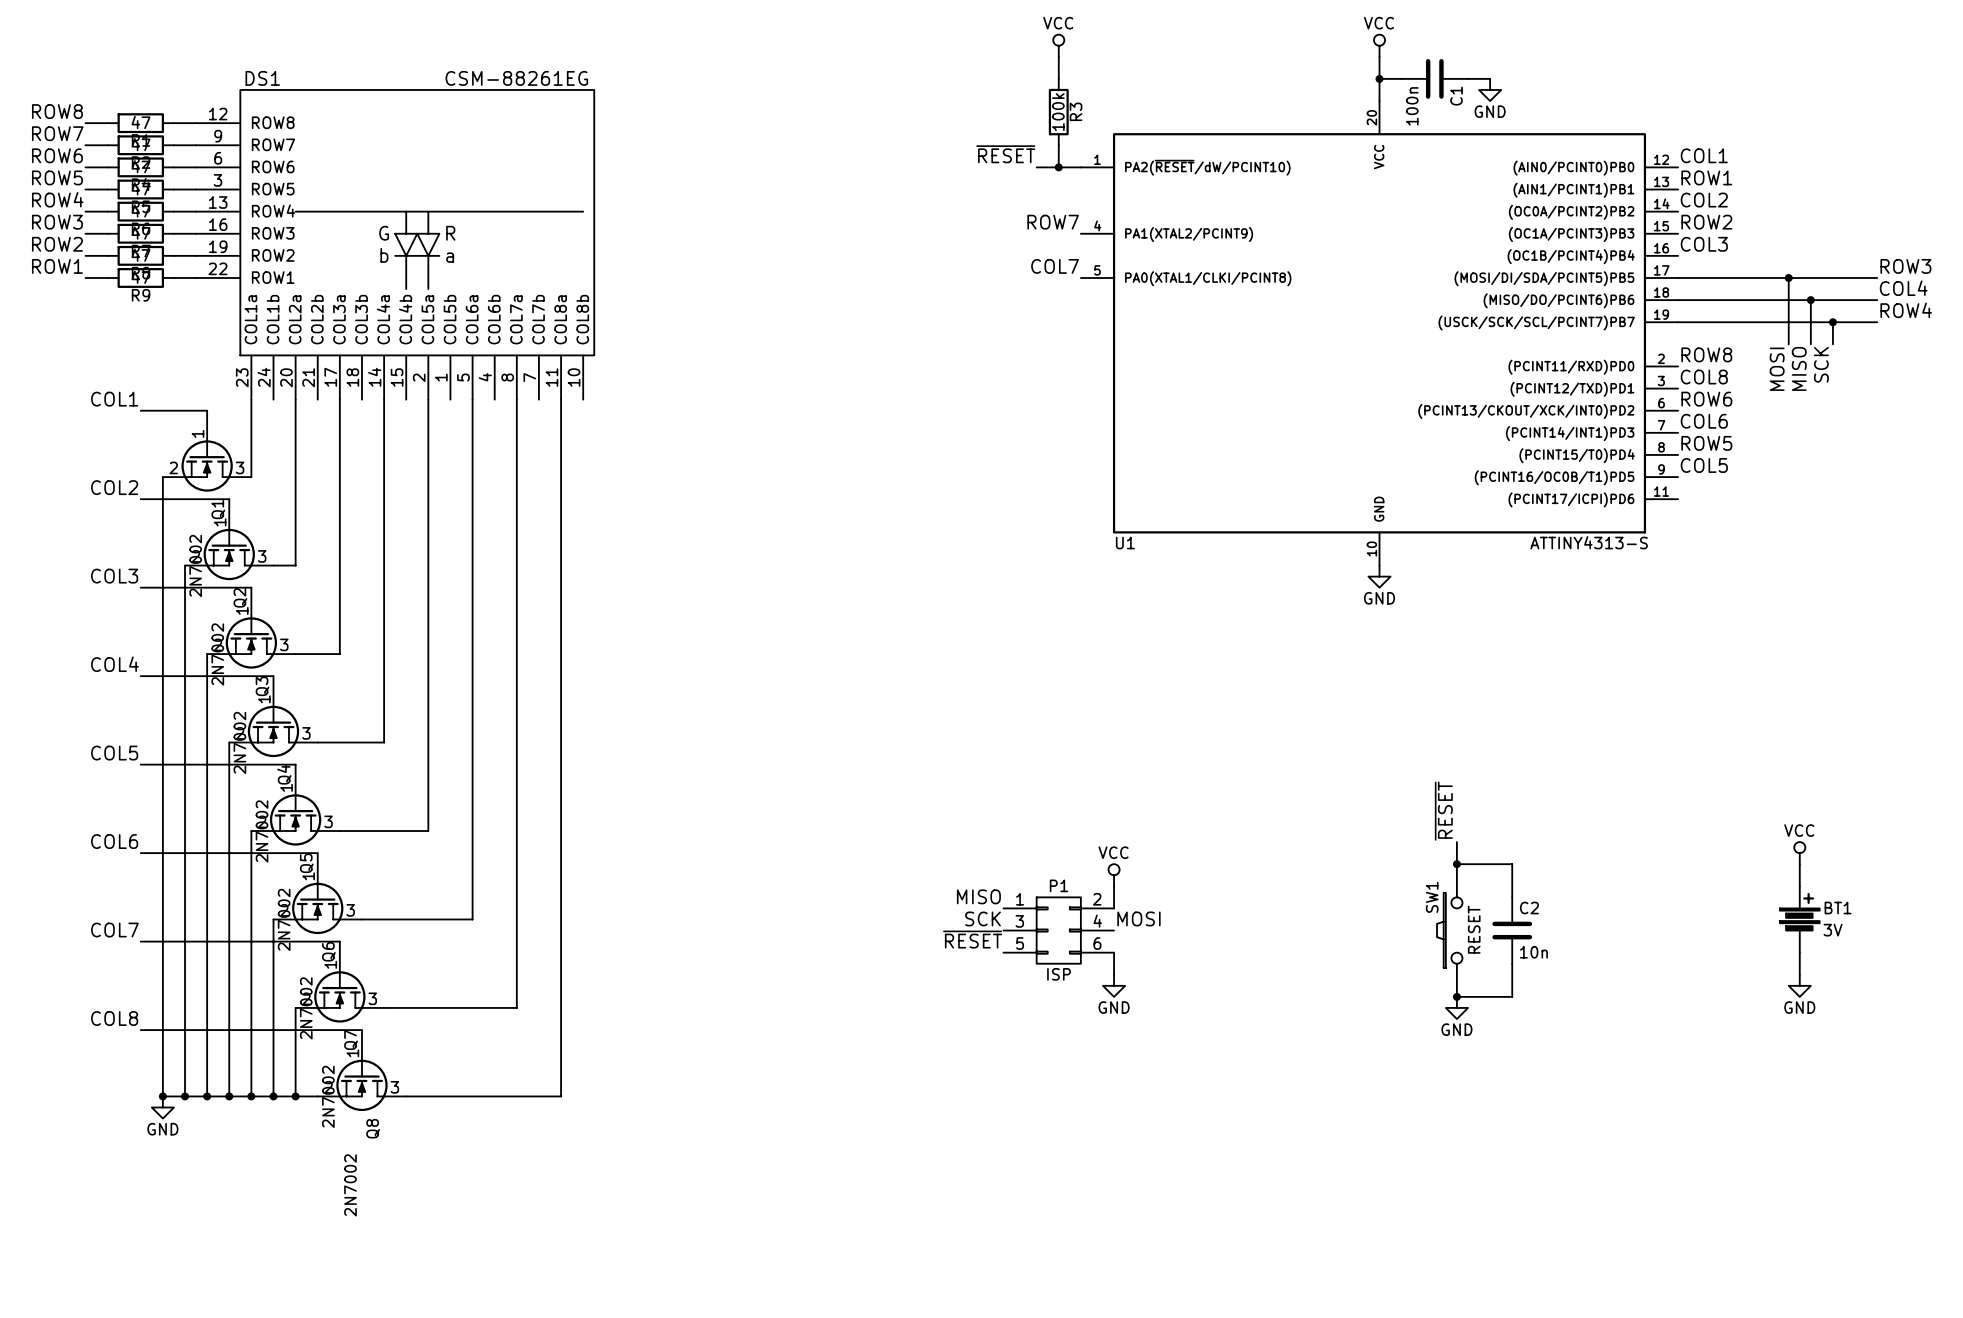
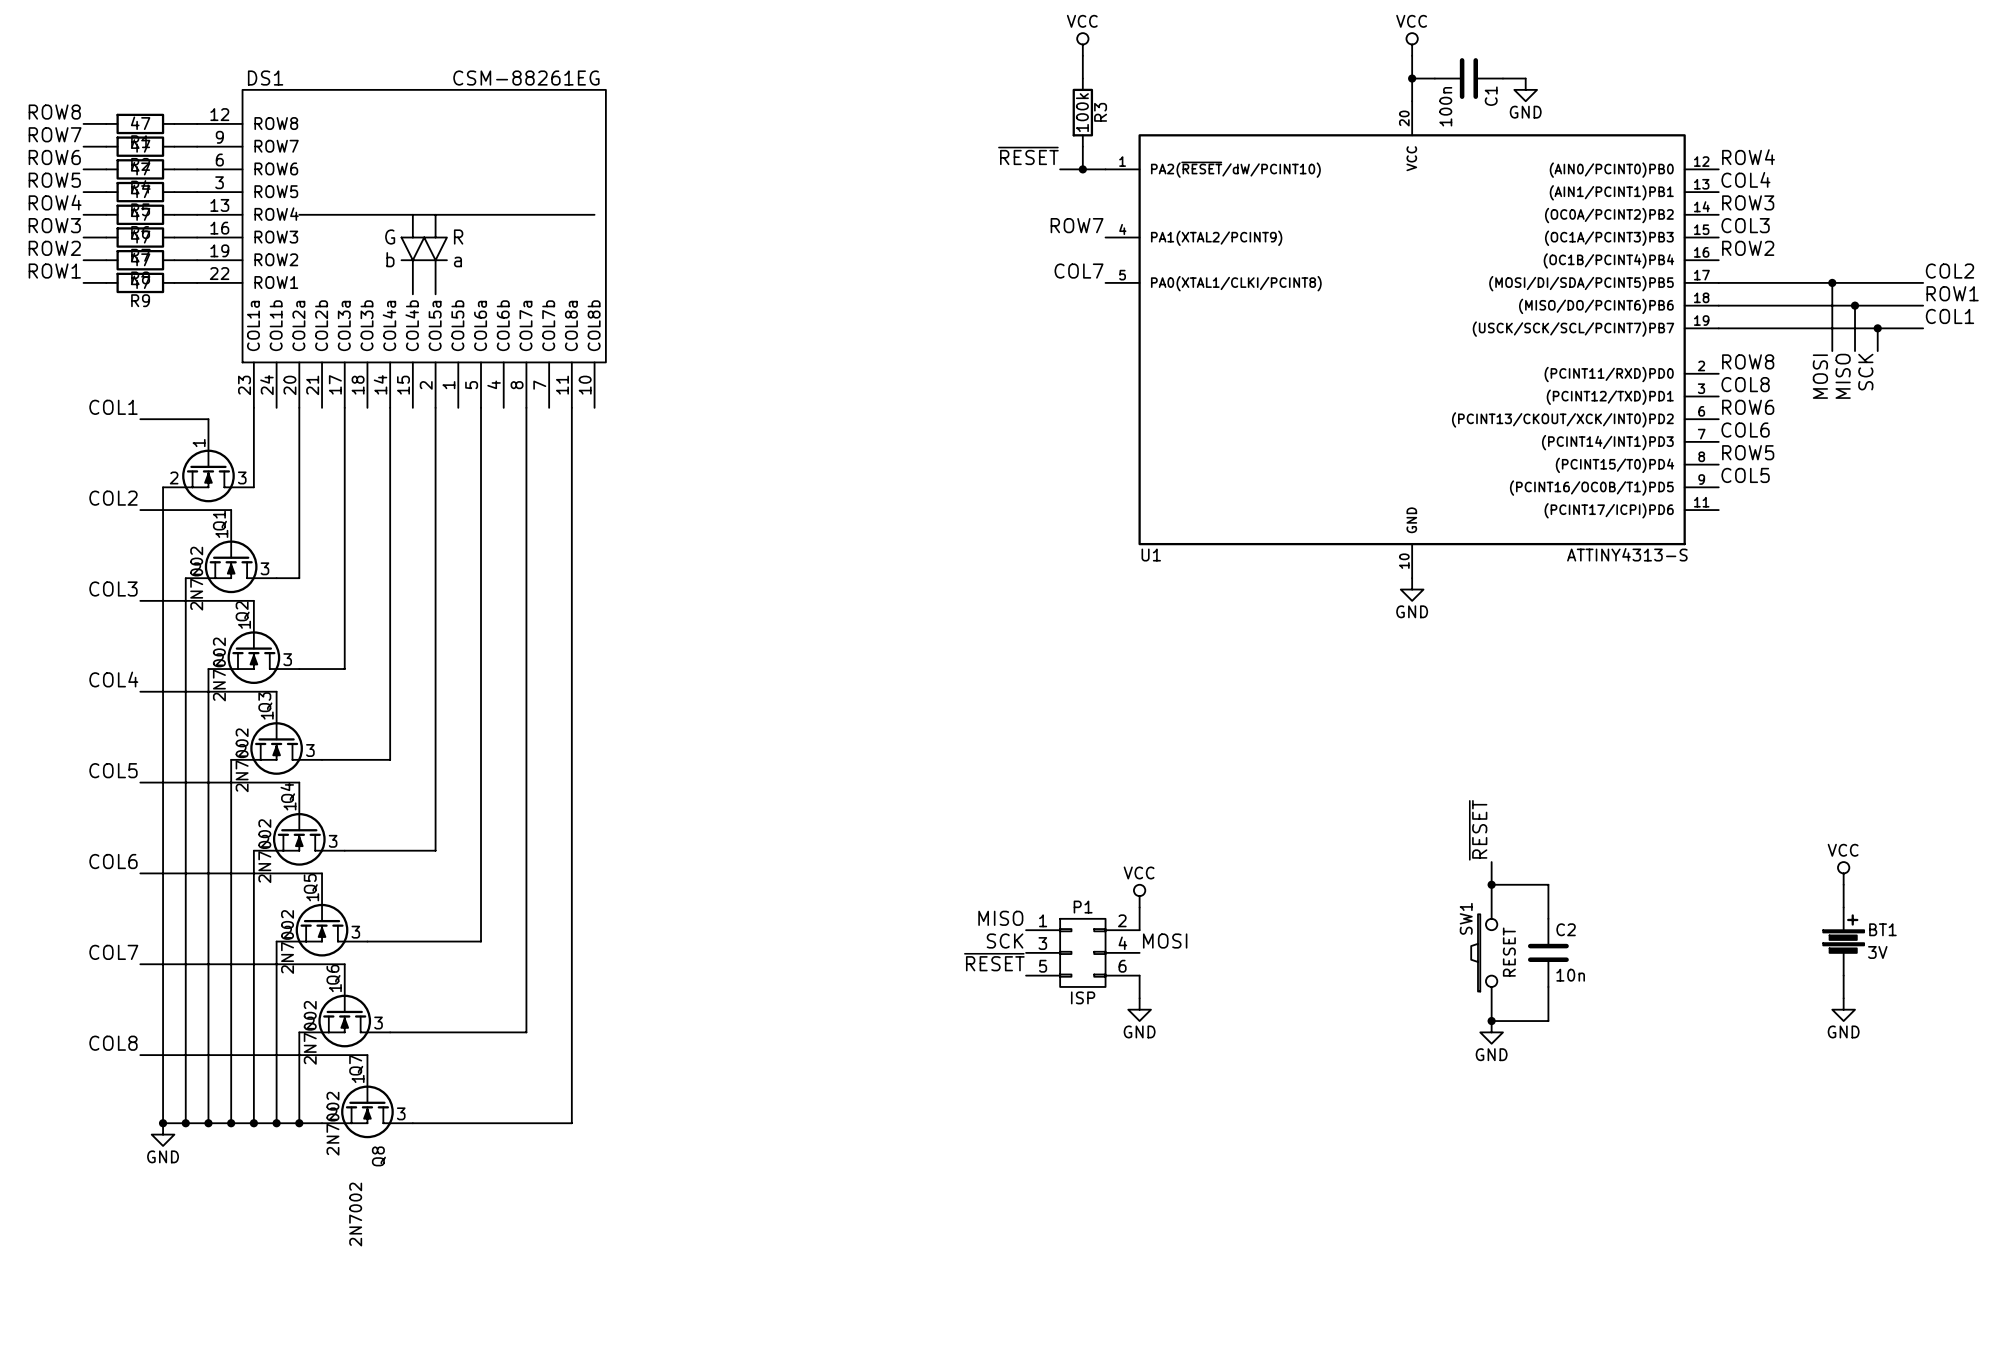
label: COL1 (1704, 155) -> ROW4 (1748, 157)
label: ROW1 (1706, 177) -> COL4 (1745, 179)
label: COL2 (1704, 200) -> ROW3 (1748, 202)
label: ROW2 (1706, 222) -> COL3 (1745, 225)
label: COL3 (1704, 244) -> ROW2 (1748, 248)
label: ROW3 (1905, 266) -> COL2 (1949, 271)
label: COL4 (1903, 288) -> ROW1 (1952, 293)
label: ROW4 (1906, 310) -> COL1 (1949, 316)

